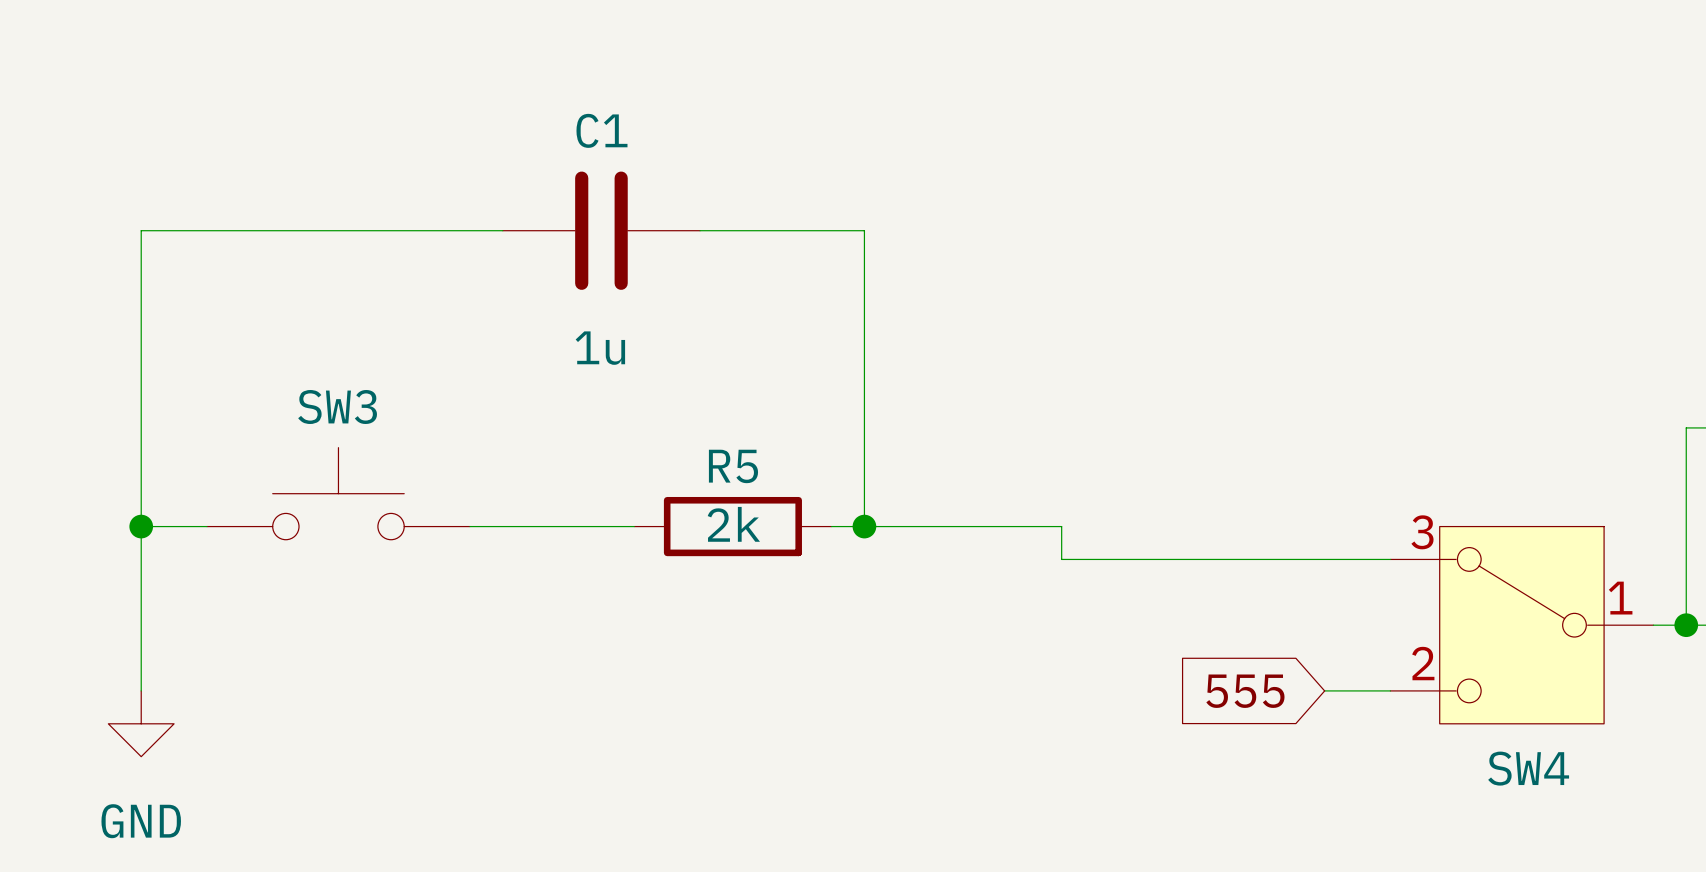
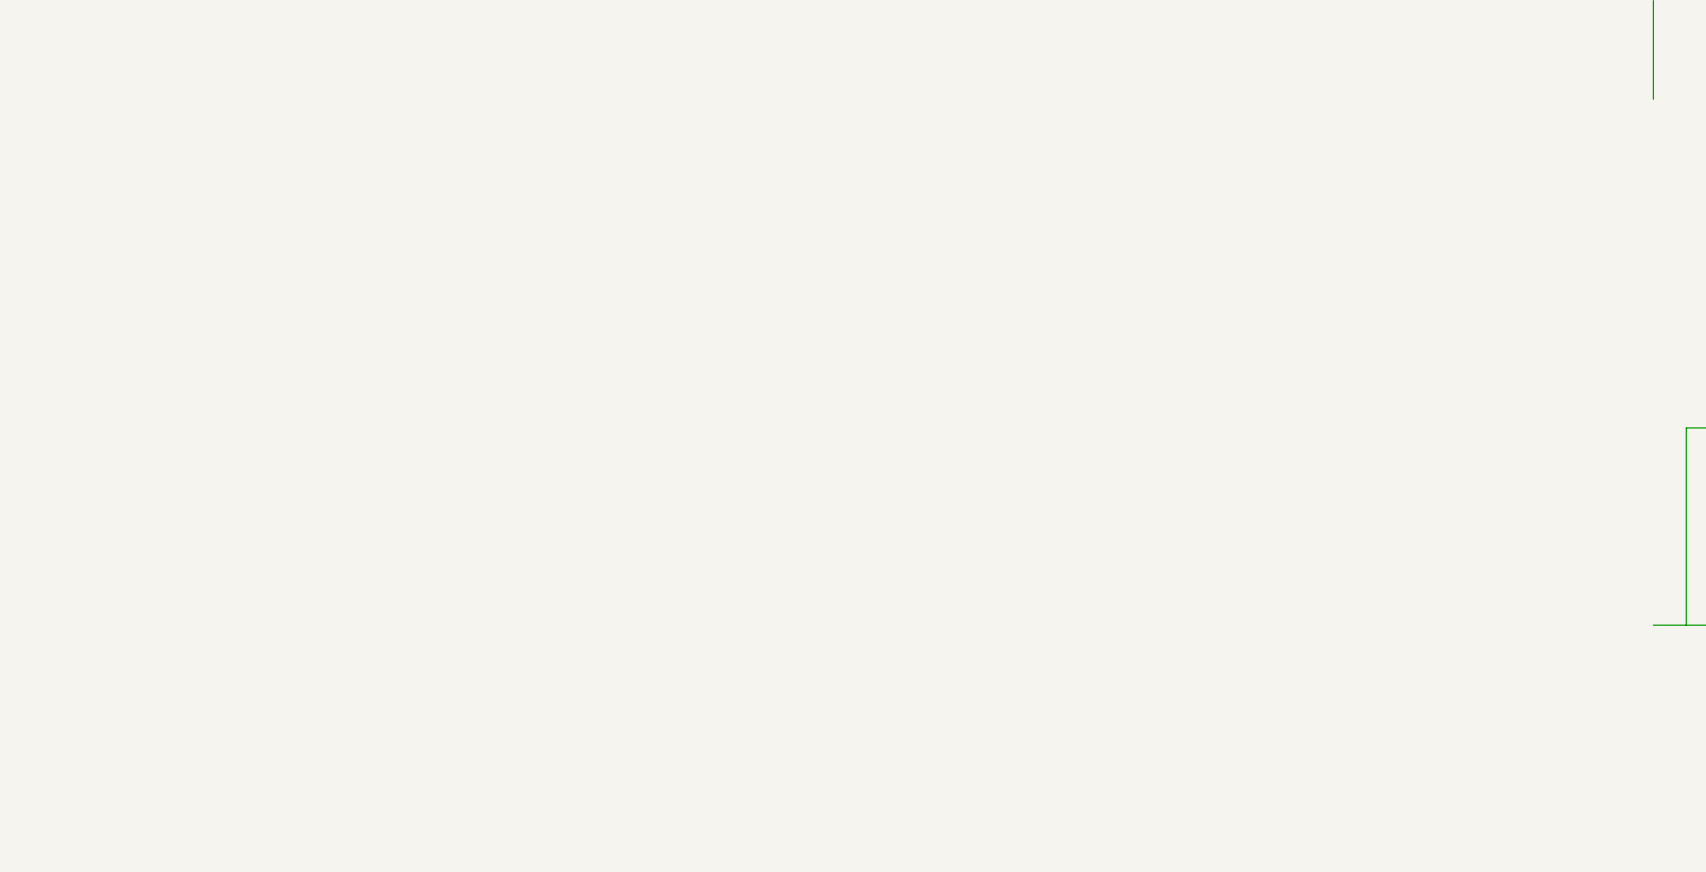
wire: none -> (1653, 0) (1653, 99)
wire: (502, 230) (141, 230) (141, 690) -> none
C1: 1u (601, 230) -> none
wire: (700, 230) (864, 230) (864, 526) -> none
SW3: (338, 493) -> none
wire: (141, 526) (206, 526) -> none
junction: (141, 526) -> none
wire: (469, 526) (634, 526) -> none
R5: 2k (732, 526) -> none
wire: (831, 526) (1061, 526) (1061, 559) (1390, 559) -> none
junction: (864, 526) -> none
SW4: (1521, 625) -> none
junction: (1686, 625) -> none
wire: (1324, 690) (1390, 690) -> none
global label: 555 (1245, 691) -> none
power symbol: GND (141, 723) -> none

